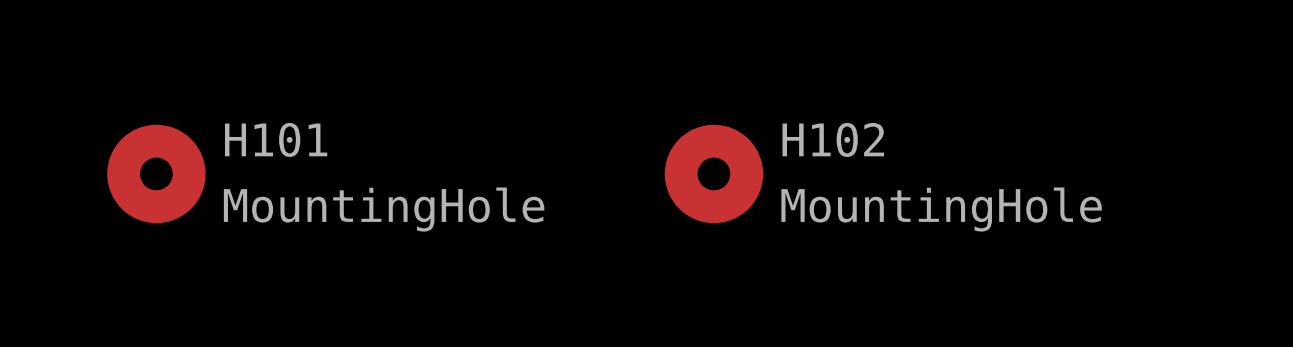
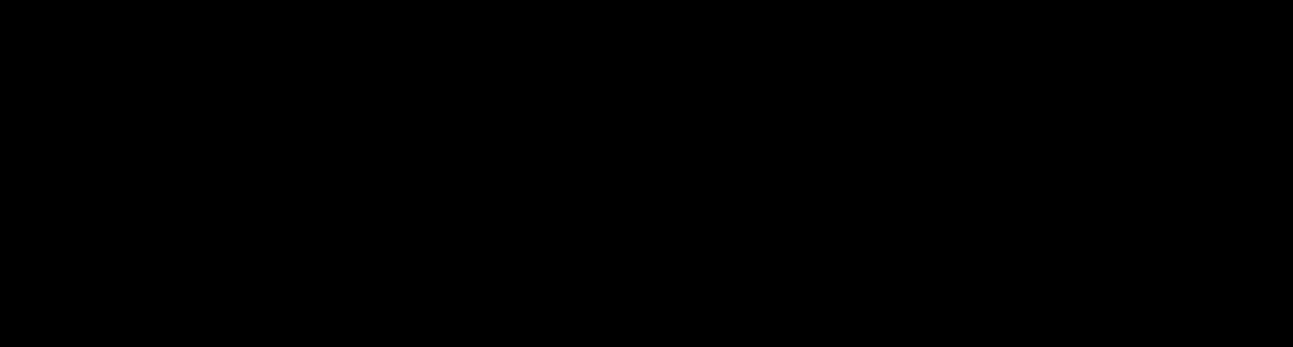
H101: MountingHole (156, 173) -> none
H102: MountingHole (713, 173) -> none

